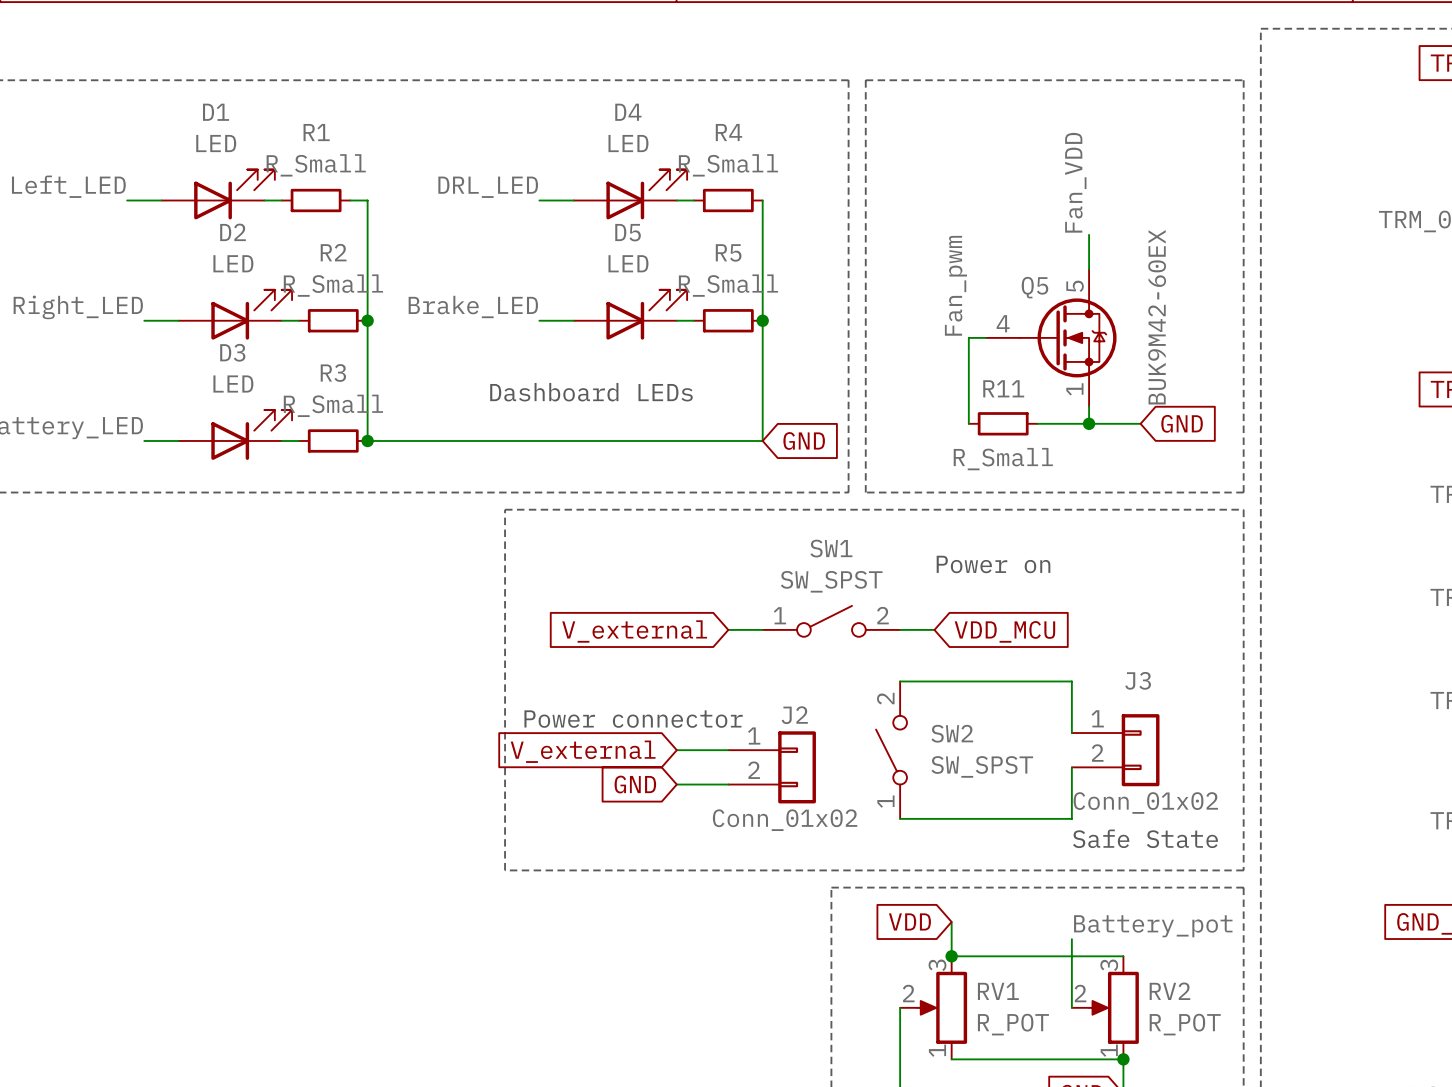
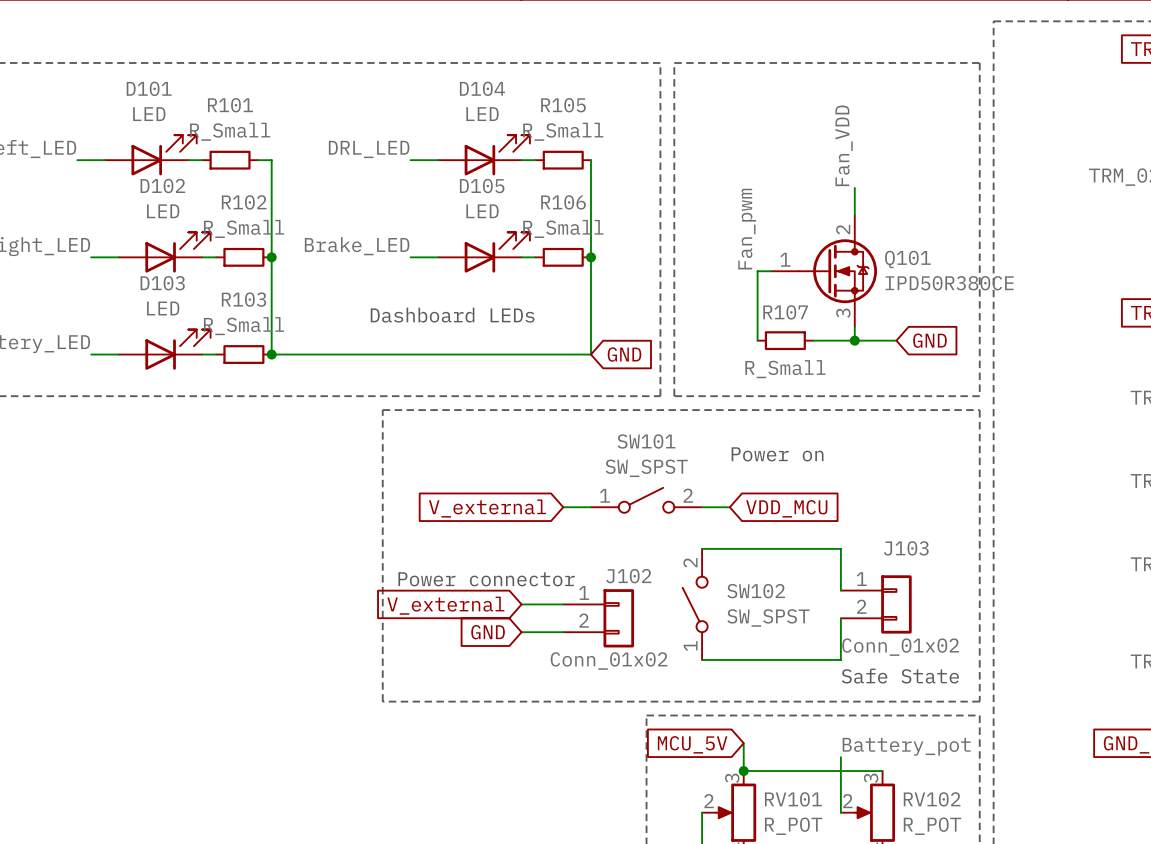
D1 name: D1 (216, 112) -> D101 (149, 88)
D4 name: D4 (628, 112) -> D104 (482, 88)
R1 name: R1 (316, 132) -> R101 (230, 105)
R4 name: R4 (728, 132) -> R105 (563, 105)
D2 name: D2 (233, 232) -> D102 (162, 186)
D5 name: D5 (628, 232) -> D105 (482, 186)
R2 name: R2 (333, 252) -> R102 (244, 202)
R5 name: R5 (728, 252) -> R106 (563, 202)
Q5 pin number: 5 (1075, 286) -> 2 (843, 229)
Q5 name: Q5 (1034, 287) -> Q101 (907, 259)
Q5 value: BUK9M42-60EX (1157, 317) -> IPD50R380CE (949, 283)
Q5 pin number: 4 (1003, 323) -> 1 (785, 259)
D3 name: D3 (232, 352) -> D103 (162, 283)
R3 name: R3 (333, 373) -> R103 (243, 299)
R11 name: R11 (1003, 388) -> R107 (785, 312)
Q5 pin number: 1 (1074, 389) -> 3 (843, 313)
SW1 name: SW1 (831, 548) -> SW101 (646, 441)
J3 name: J3 (1138, 680) -> J103 (906, 548)
J2 name: J2 (794, 715) -> J102 (628, 576)
SW2 name: SW2 (952, 733) -> SW102 (756, 591)
global label: VDD (909, 921) -> MCU_5V (692, 744)
RV1 name: RV1 (998, 991) -> RV101 (793, 799)
RV2 name: RV2 (1169, 991) -> RV102 (932, 799)

